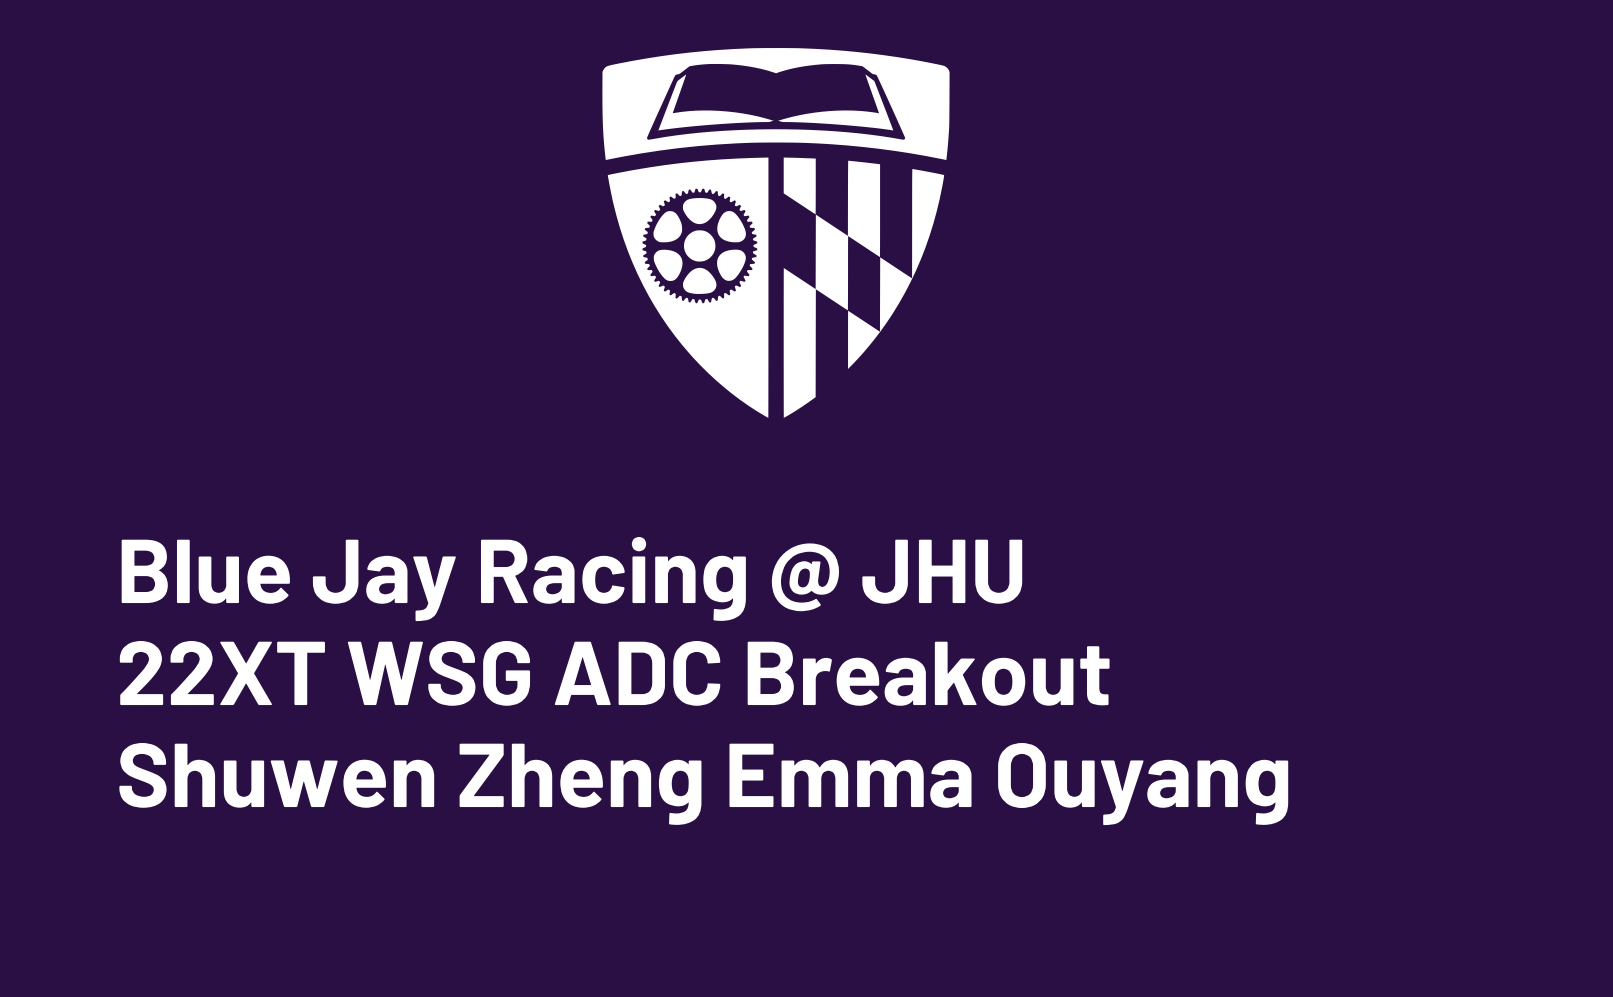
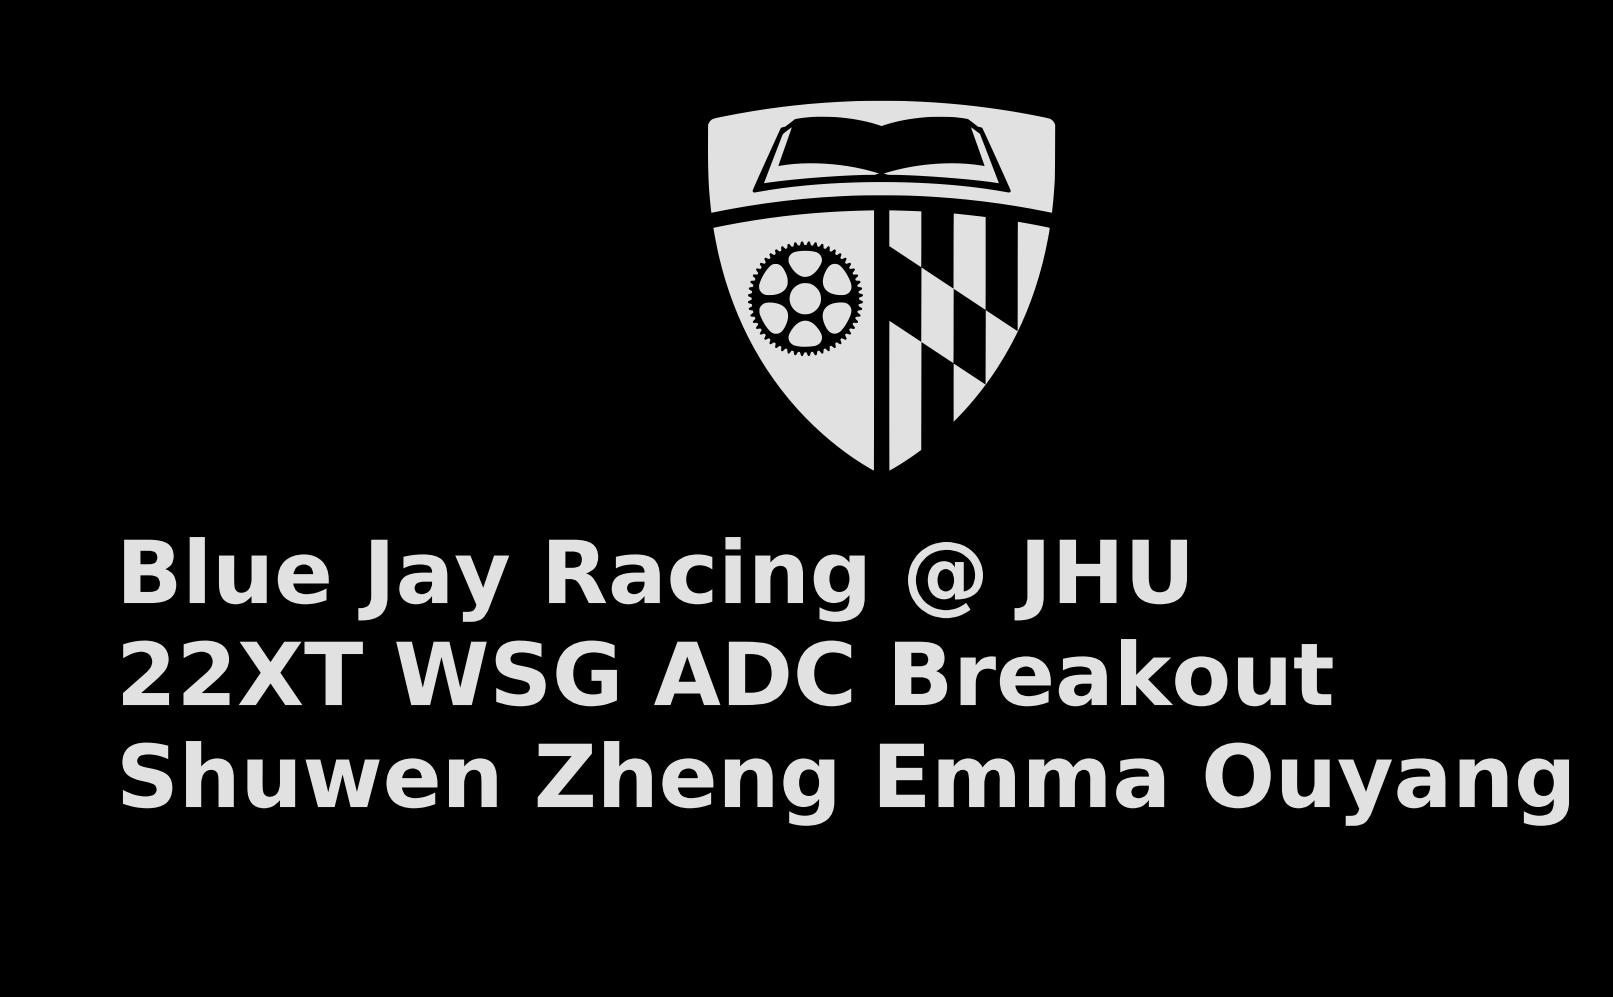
drawing position: (776, 232) -> (881, 285)

